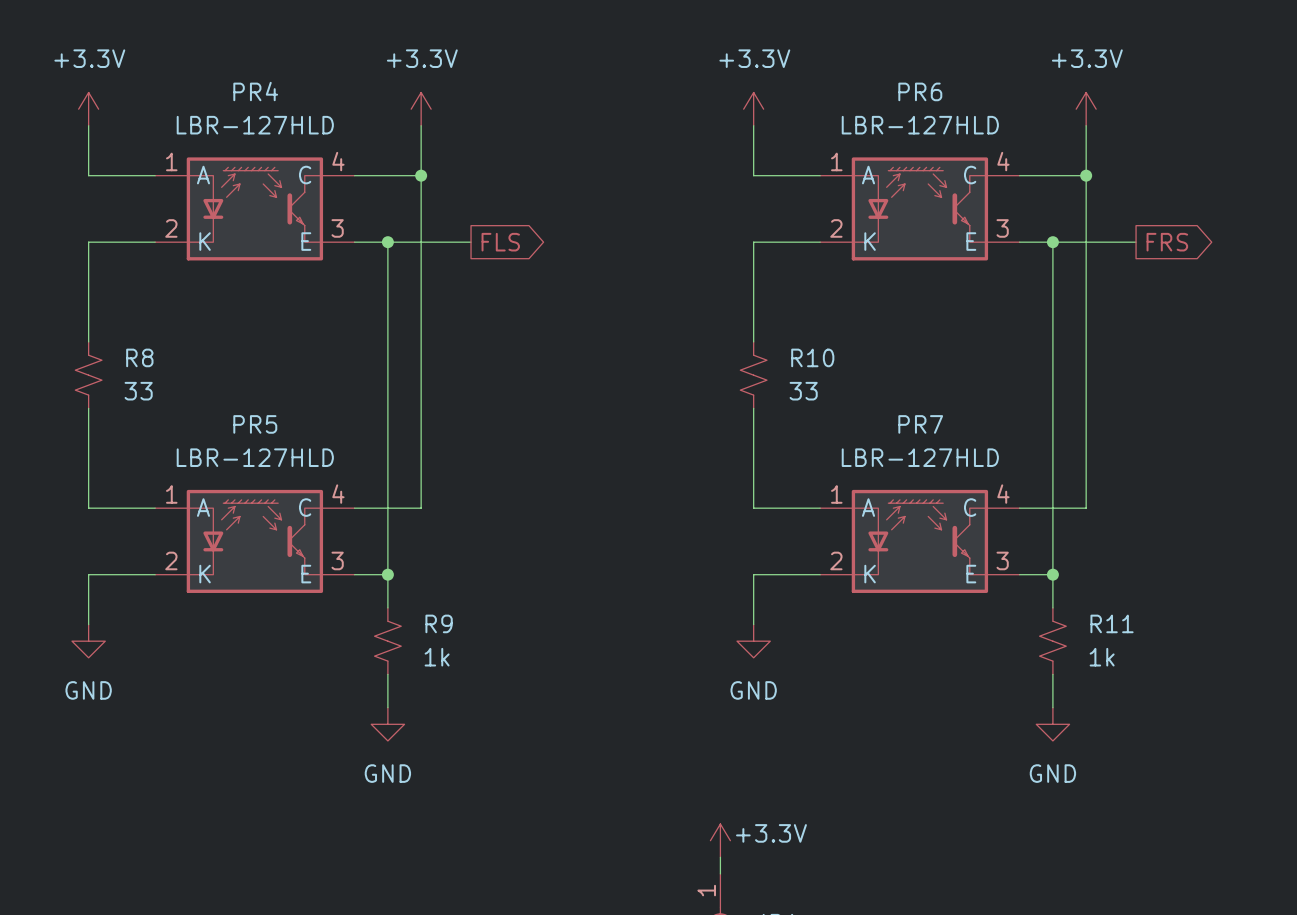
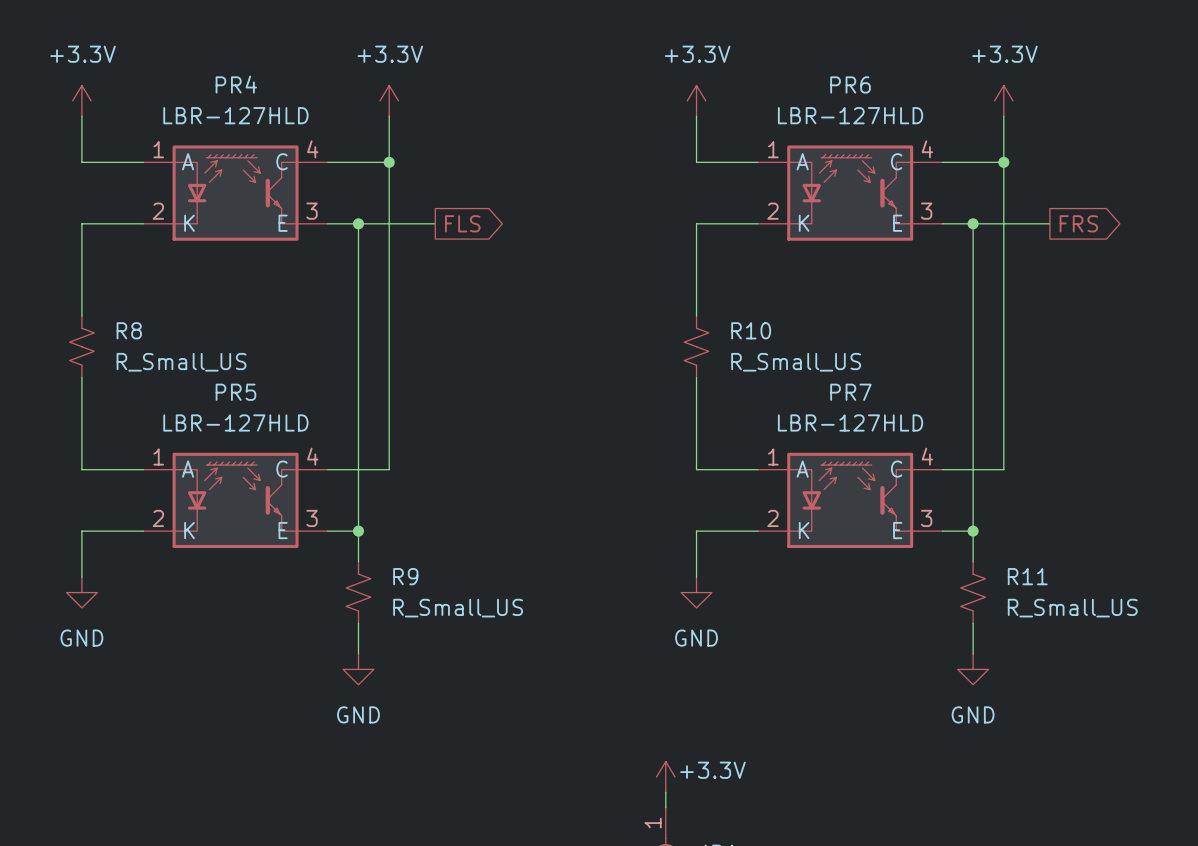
R8 value: 33 (138, 391) -> R_Small_US (181, 362)
R10 value: 33 (803, 391) -> R_Small_US (796, 362)
R9 value: 1k (437, 657) -> R_Small_US (458, 608)
R11 value: 1k (1102, 657) -> R_Small_US (1072, 608)

